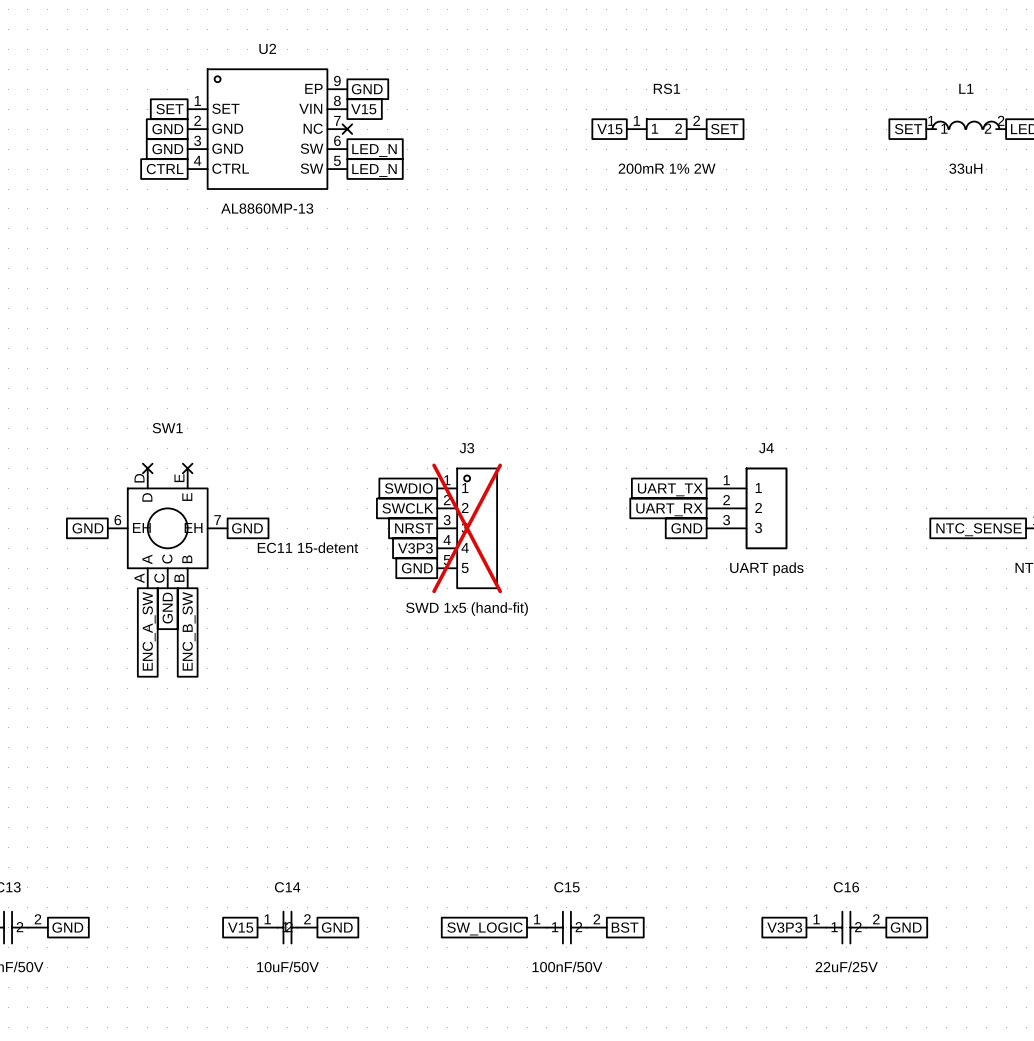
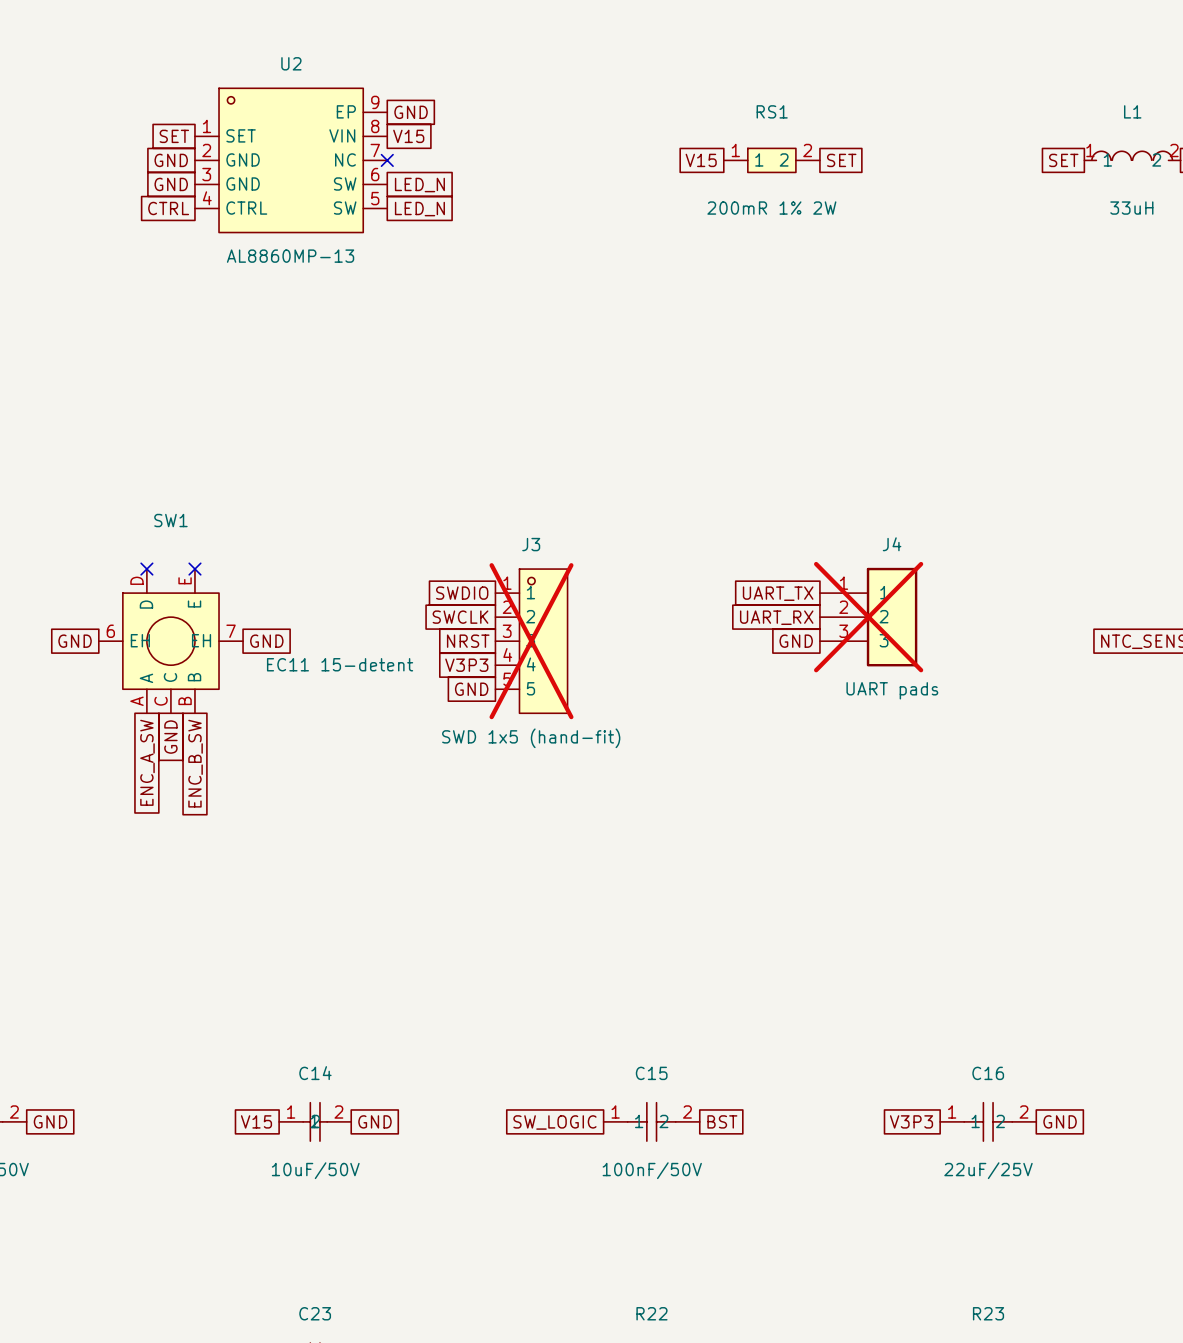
J4 do-not-place cross: none -> (868, 617)

